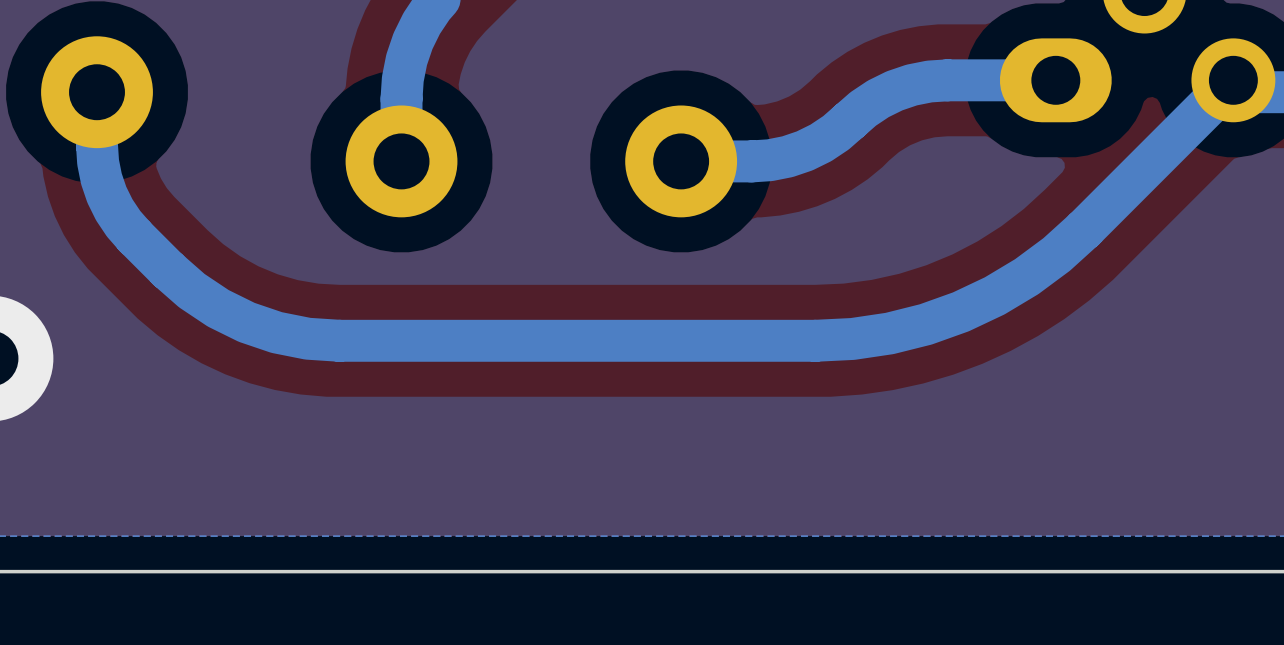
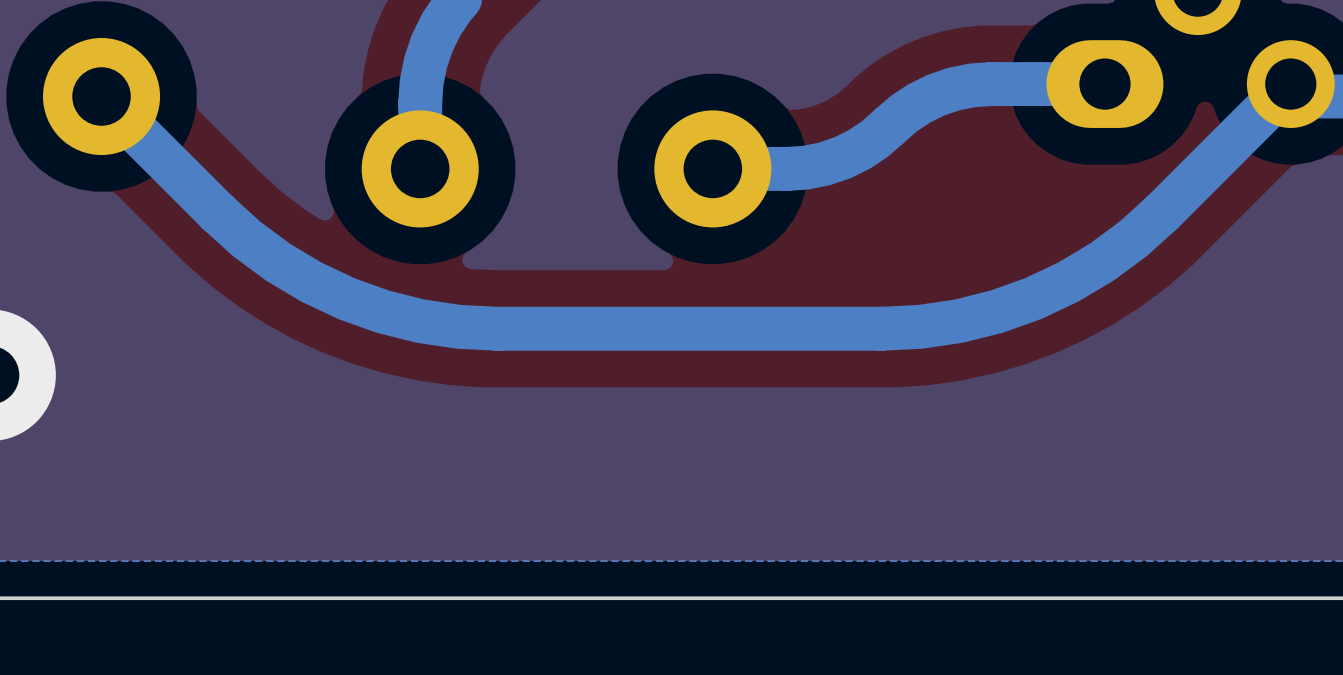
bottom track: (97, 92) (97, 145) (101, 178) (114, 209) (123, 223) (168, 269) (191, 290) (218, 308) (246, 322) (276, 332) (307, 338) (339, 340) (815, 340) (852, 338) (889, 333) (925, 324) (960, 311) (994, 295) (1026, 276) (1056, 254) (1110, 202) -> (101, 96) (217, 212) (246, 238) (277, 261) (311, 281) (346, 298) (382, 311) (420, 321) (459, 326) (498, 328) (881, 328) (920, 326) (958, 321) (996, 311) (1033, 298) (1068, 281) (1102, 261) (1133, 238) (1162, 212)

